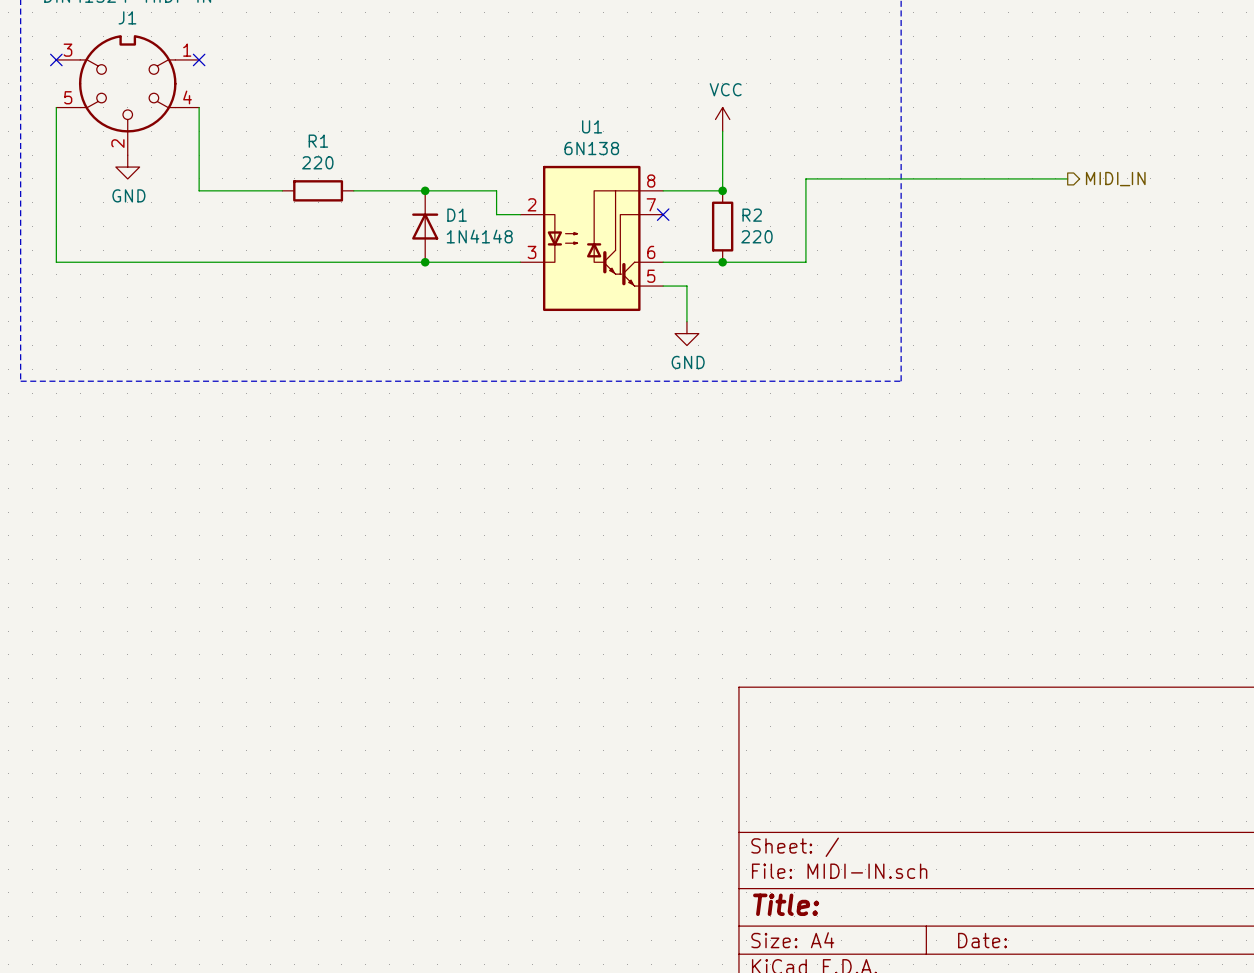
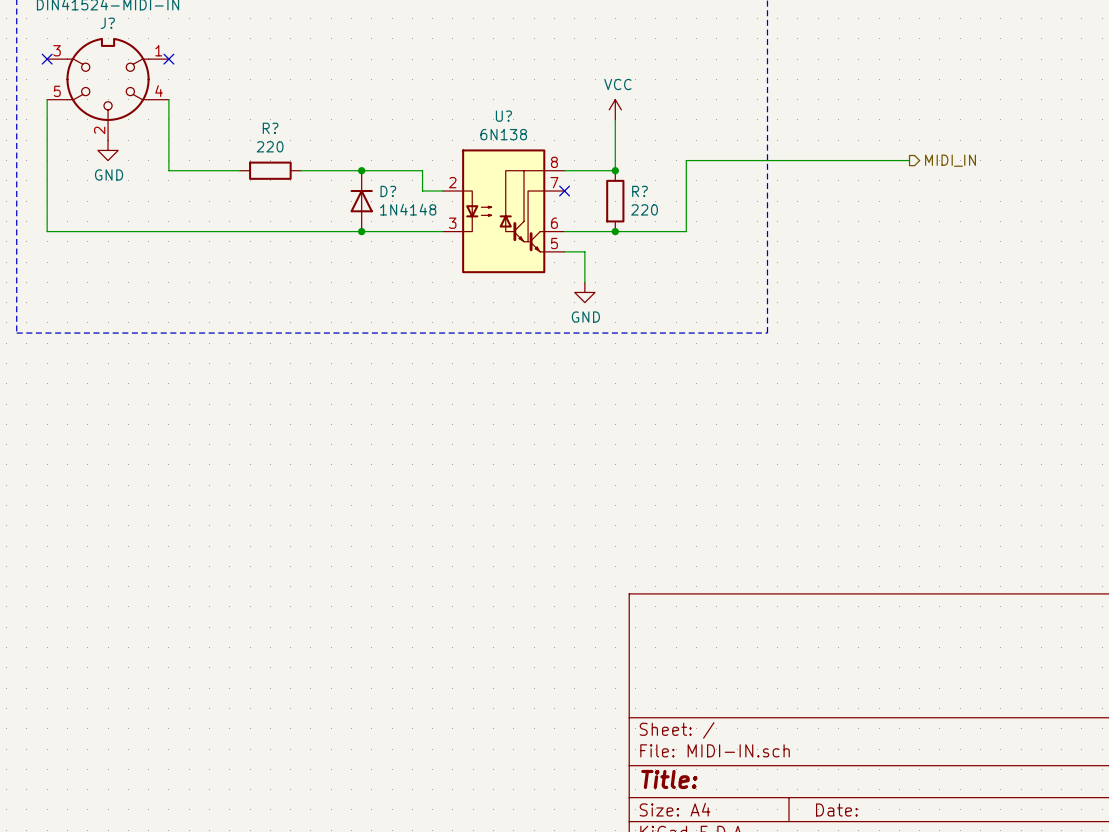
J1 name: J1 (127, 17) -> J? (107, 23)
U1 name: U1 (592, 126) -> U? (503, 116)
R1 name: R1 (318, 141) -> R? (270, 128)
D1 name: D1 (457, 215) -> D? (388, 191)
R2 name: R2 (752, 215) -> R? (639, 191)

